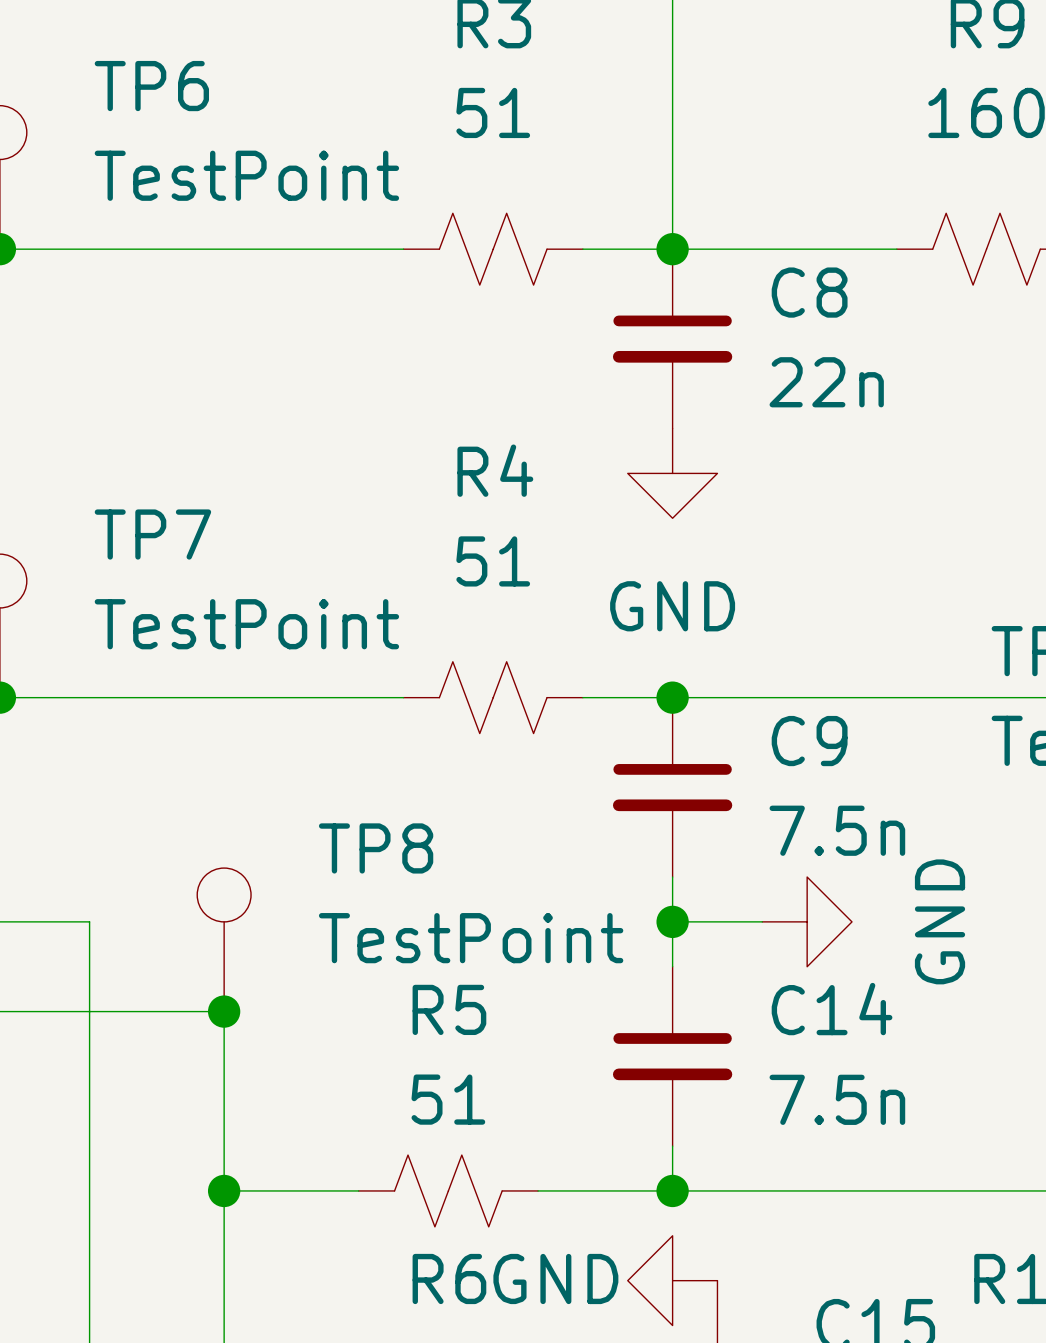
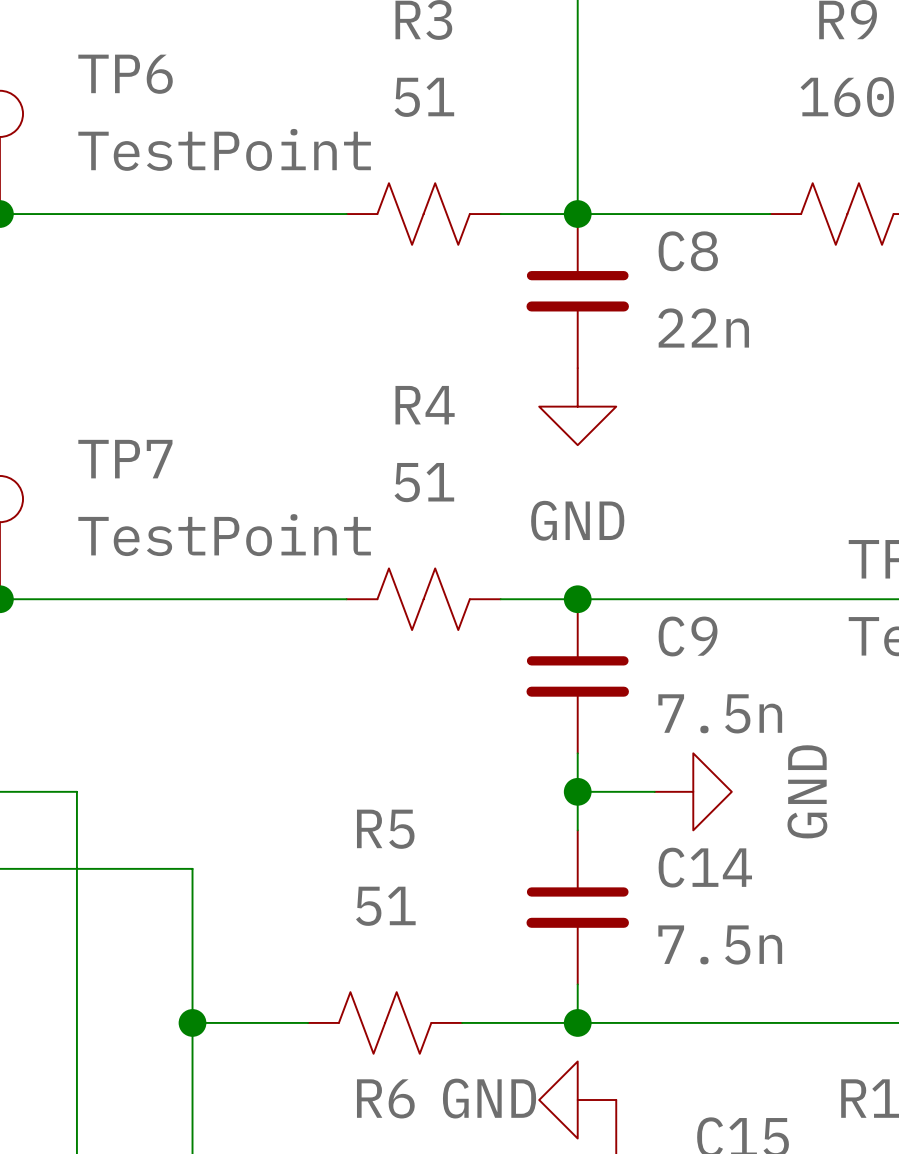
TP8: TestPoint (224, 939) -> none
R5 name position: R5 (449, 1009) -> R5 (385, 829)
junction: (224, 1011) -> none
R5 value position: 51 (448, 1099) -> 51 (385, 906)

